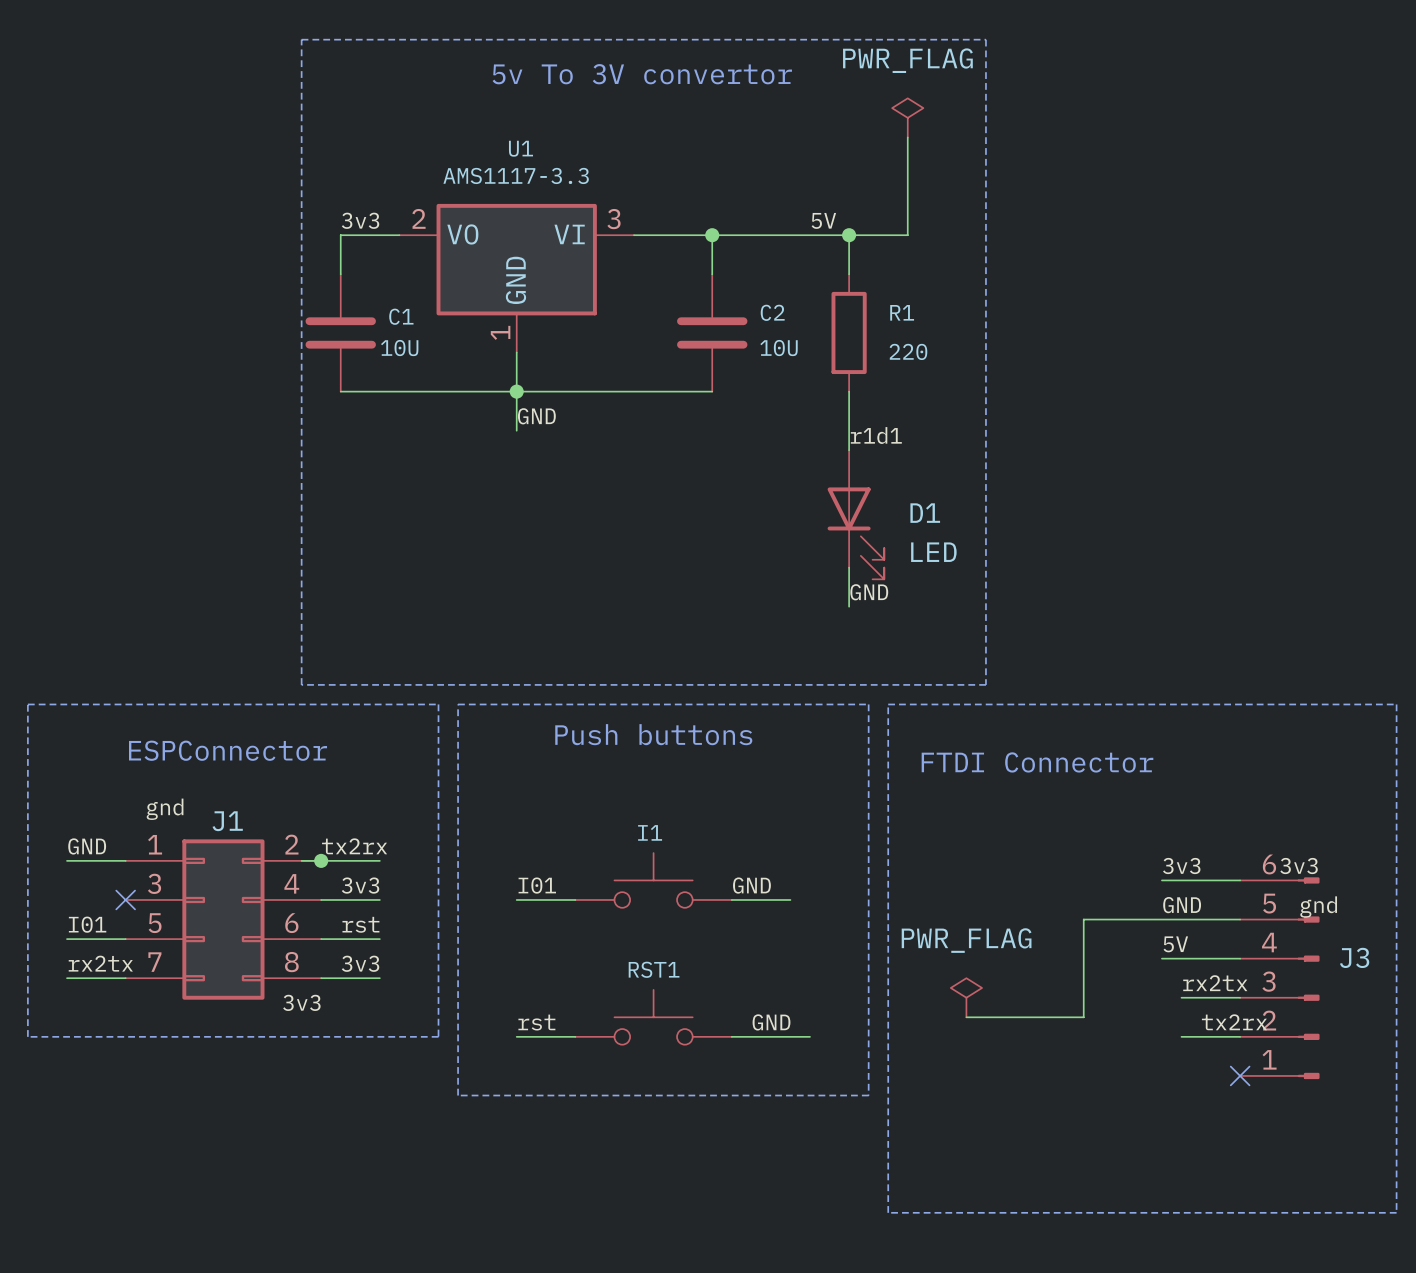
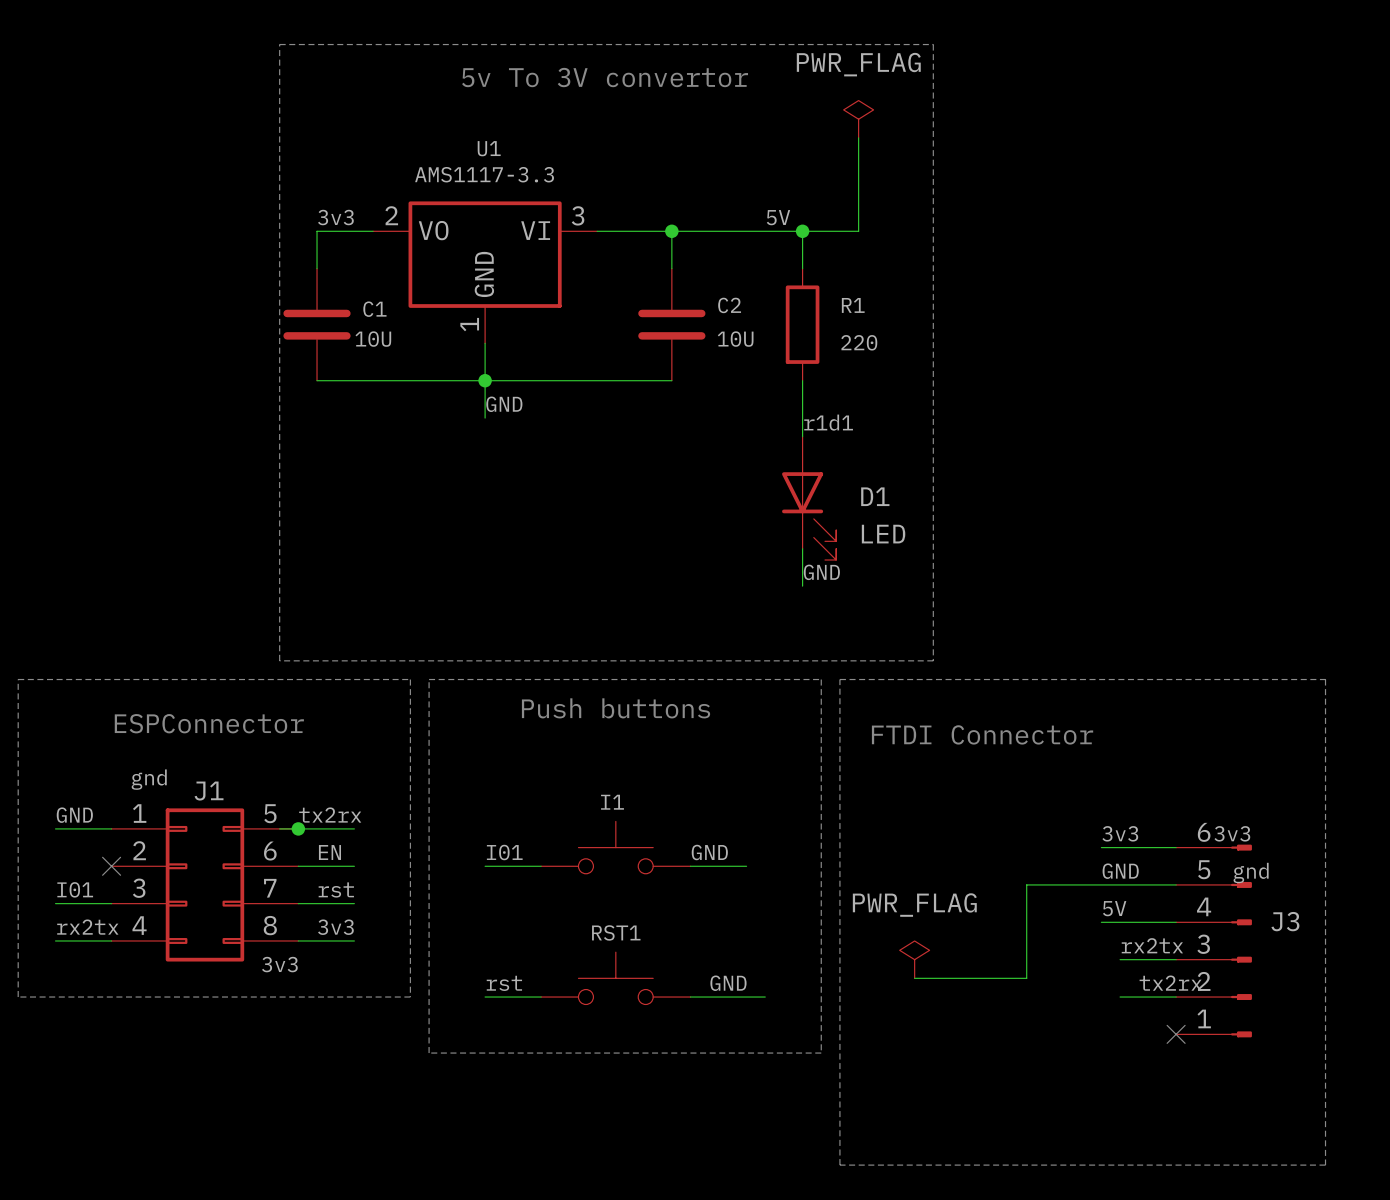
J1 pin number: 2 (291, 844) -> 5 (270, 813)
J1 pin number: 3 (154, 883) -> 2 (139, 850)
J1 pin number: 4 (291, 883) -> 6 (270, 851)
label: 3v3 (360, 885) -> EN (329, 852)
J1 pin number: 5 (155, 923) -> 3 (139, 888)
J1 pin number: 6 (291, 923) -> 7 (270, 888)
J1 pin number: 7 (154, 962) -> 4 (139, 925)

